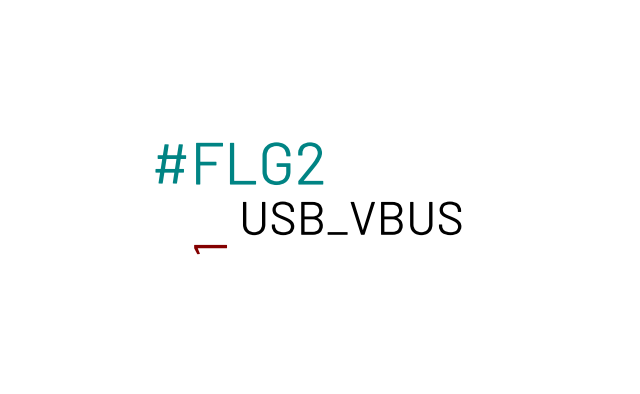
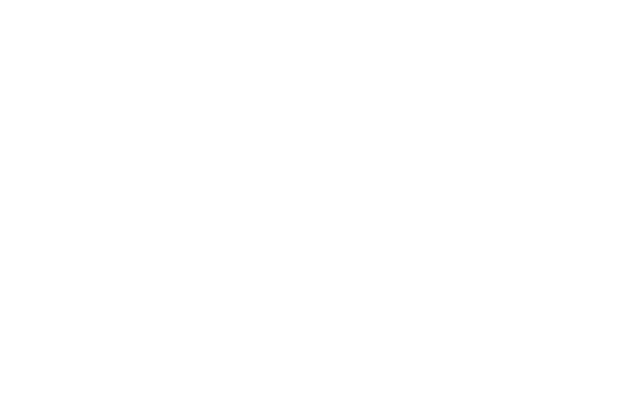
#FLG2: (239, 198) -> none
label: USB_VBUS (352, 218) -> none

